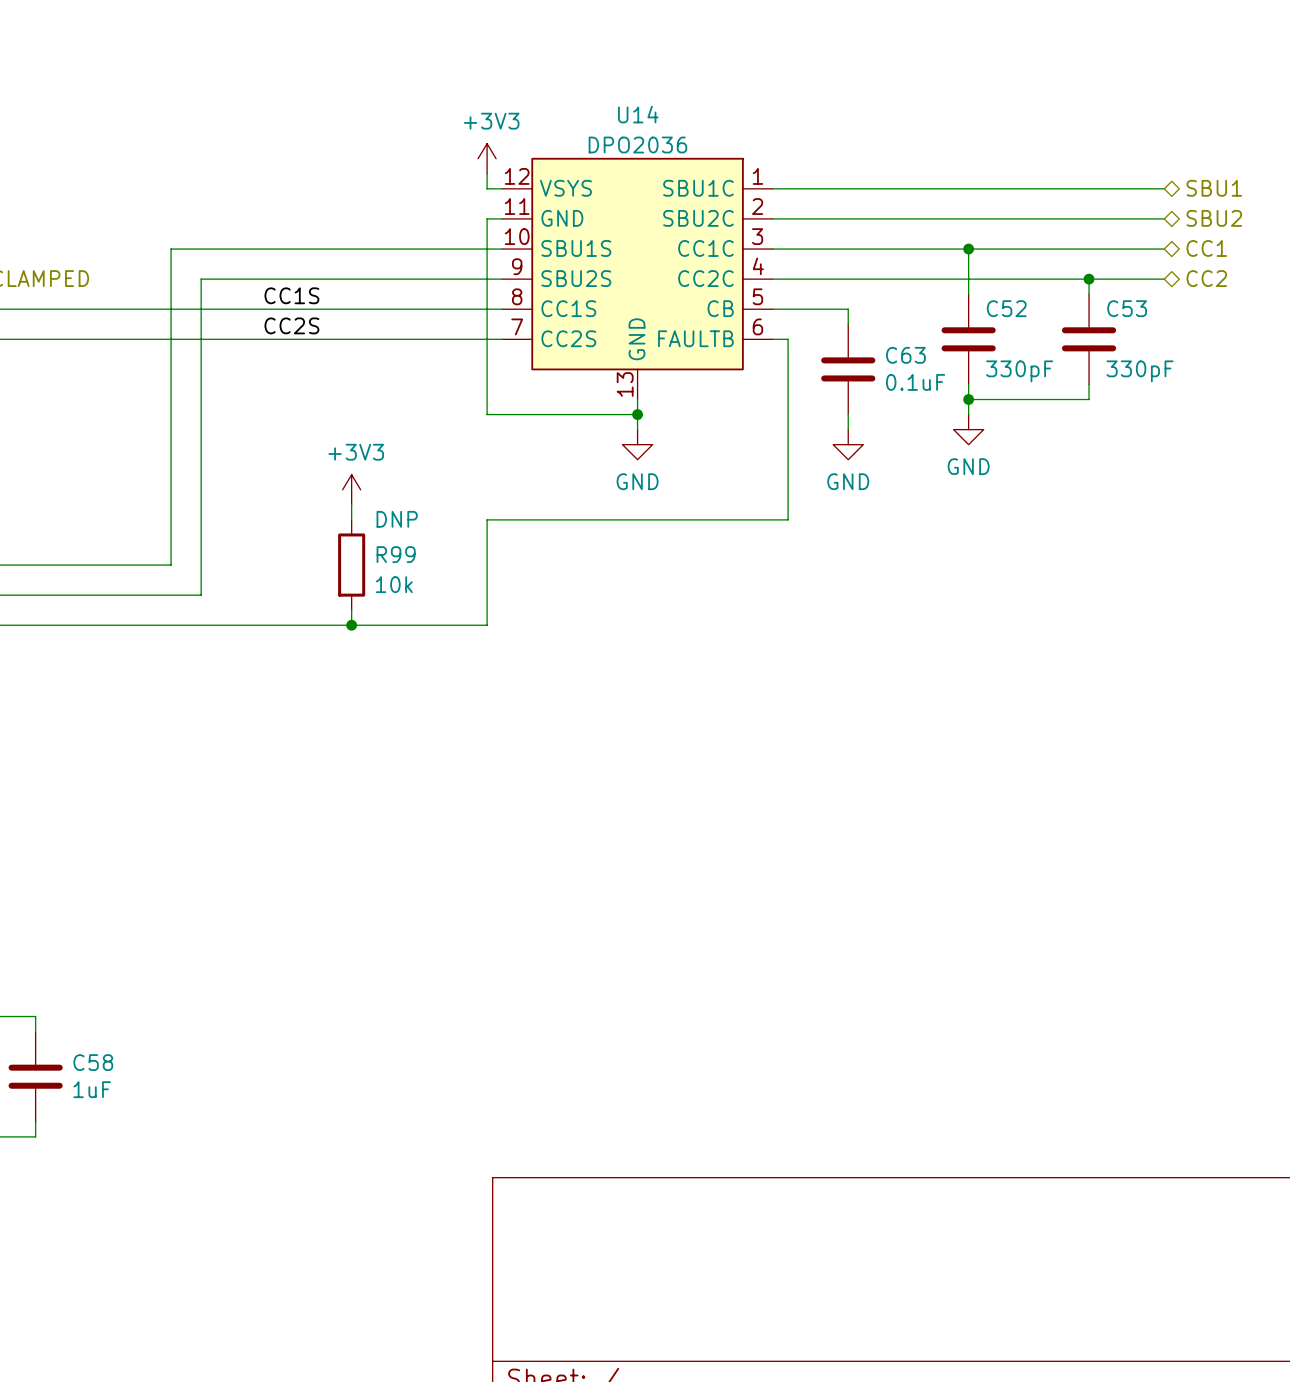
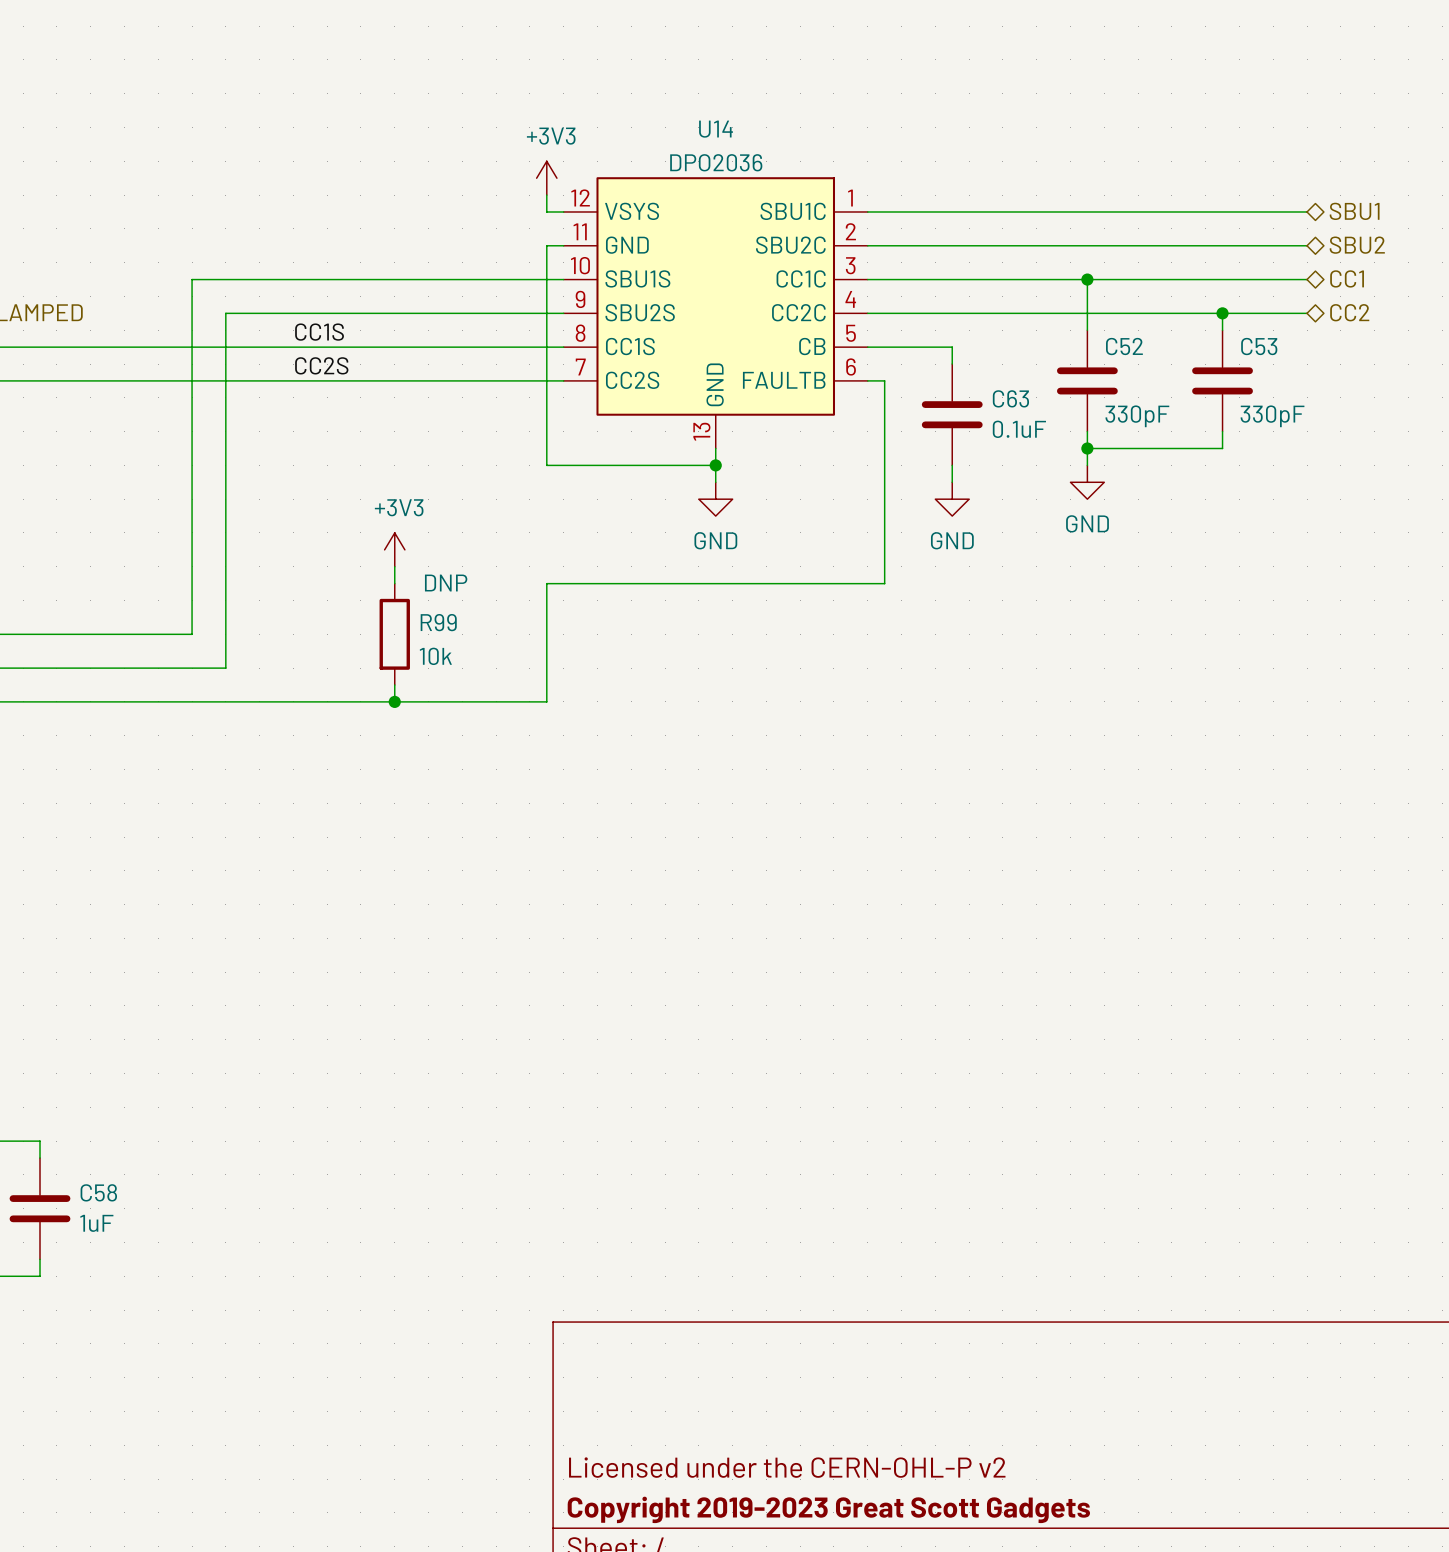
title block: none -> Licensed under the CERN-OHL-P v2 (787, 1467)
title block: none -> Copyright 2019-2023 Great Scott Gadgets (828, 1509)

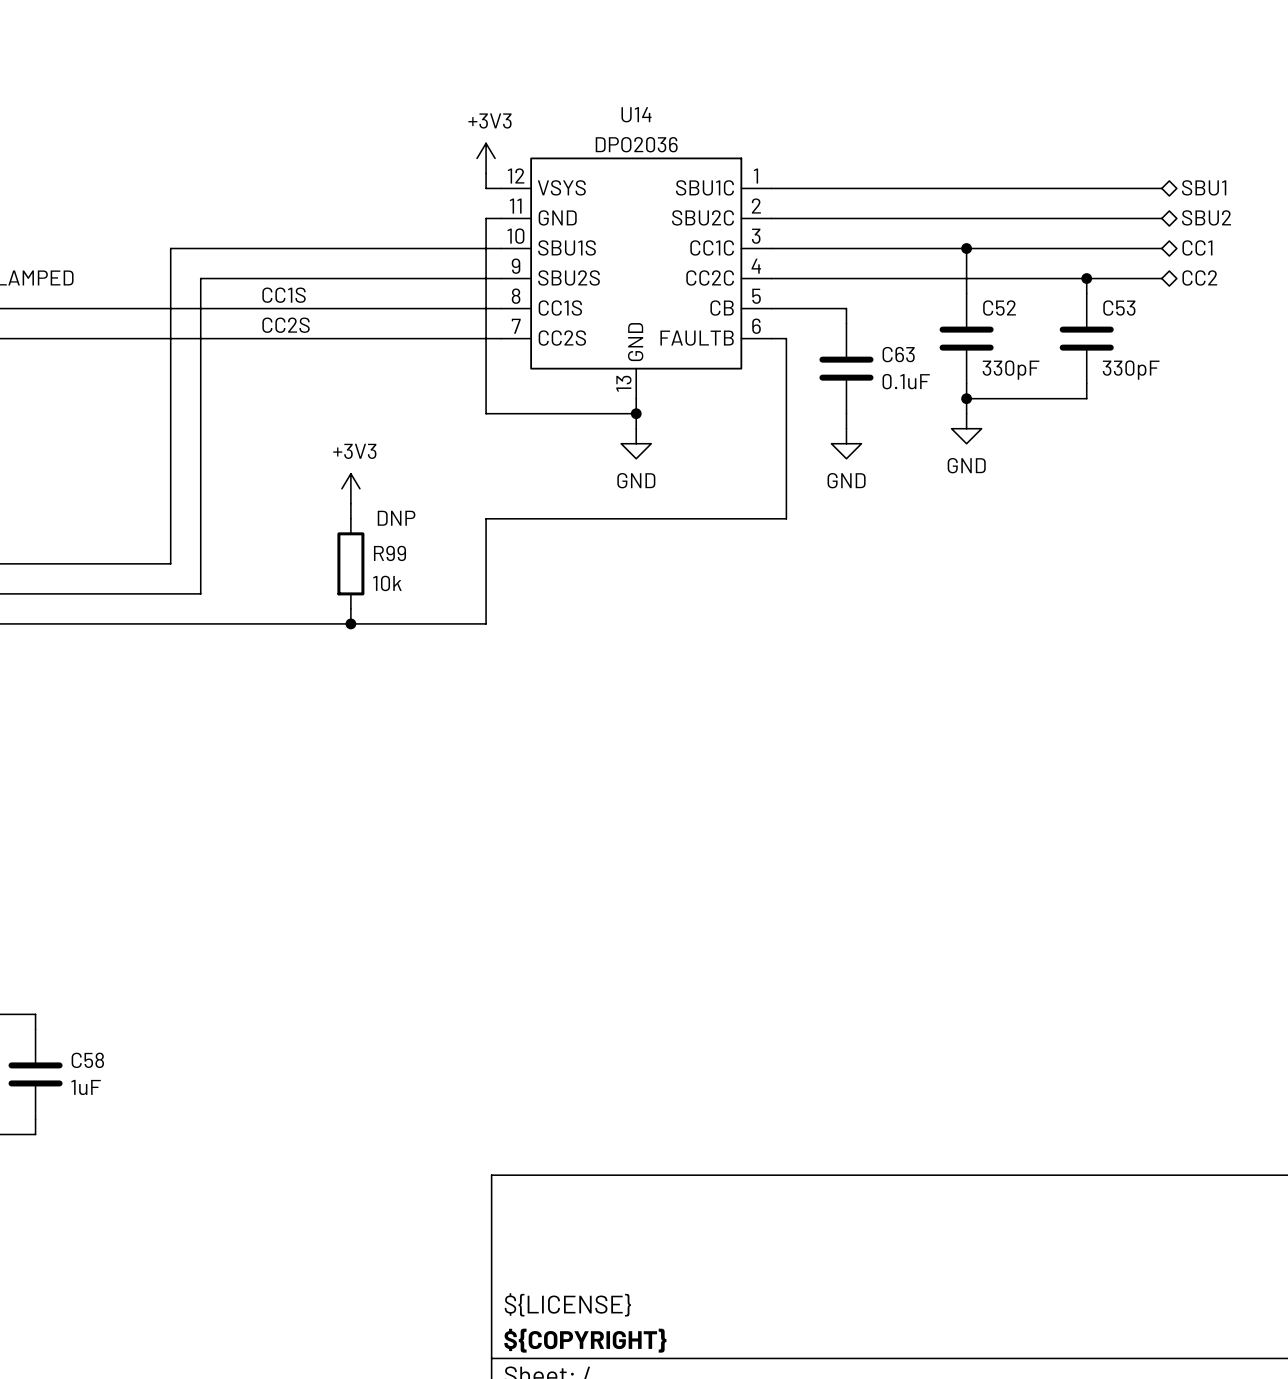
title block: Licensed under the CERN-OHL-P v2 (787, 1467) -> ${LICENSE} (567, 1304)
title block: Copyright 2019-2023 Great Scott Gadgets (828, 1509) -> ${COPYRIGHT} (585, 1340)

